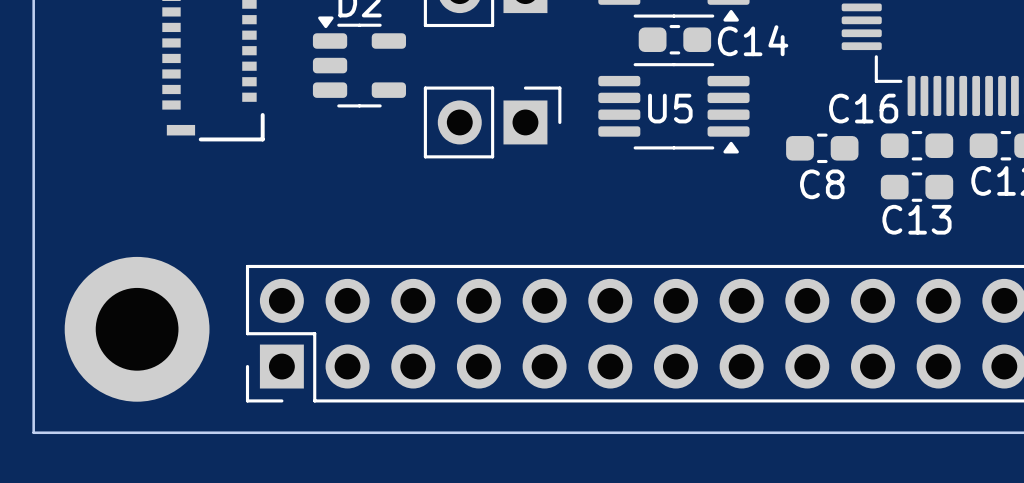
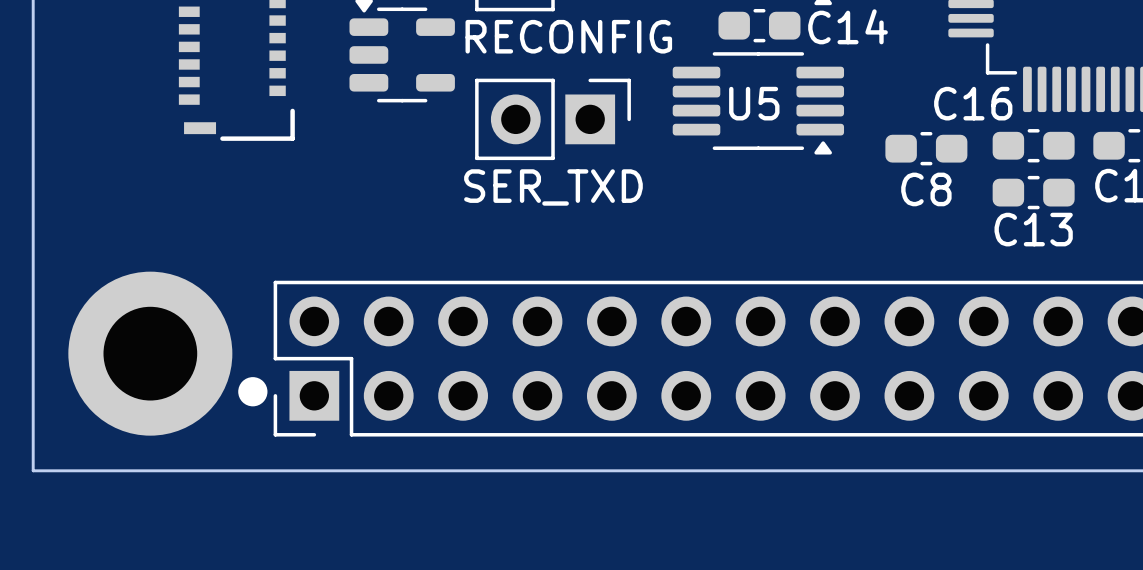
text: none -> RECONFIG (568, 36)
text: none -> SER_TXD (553, 187)
drawing: none -> [238, 377, 268, 407]

